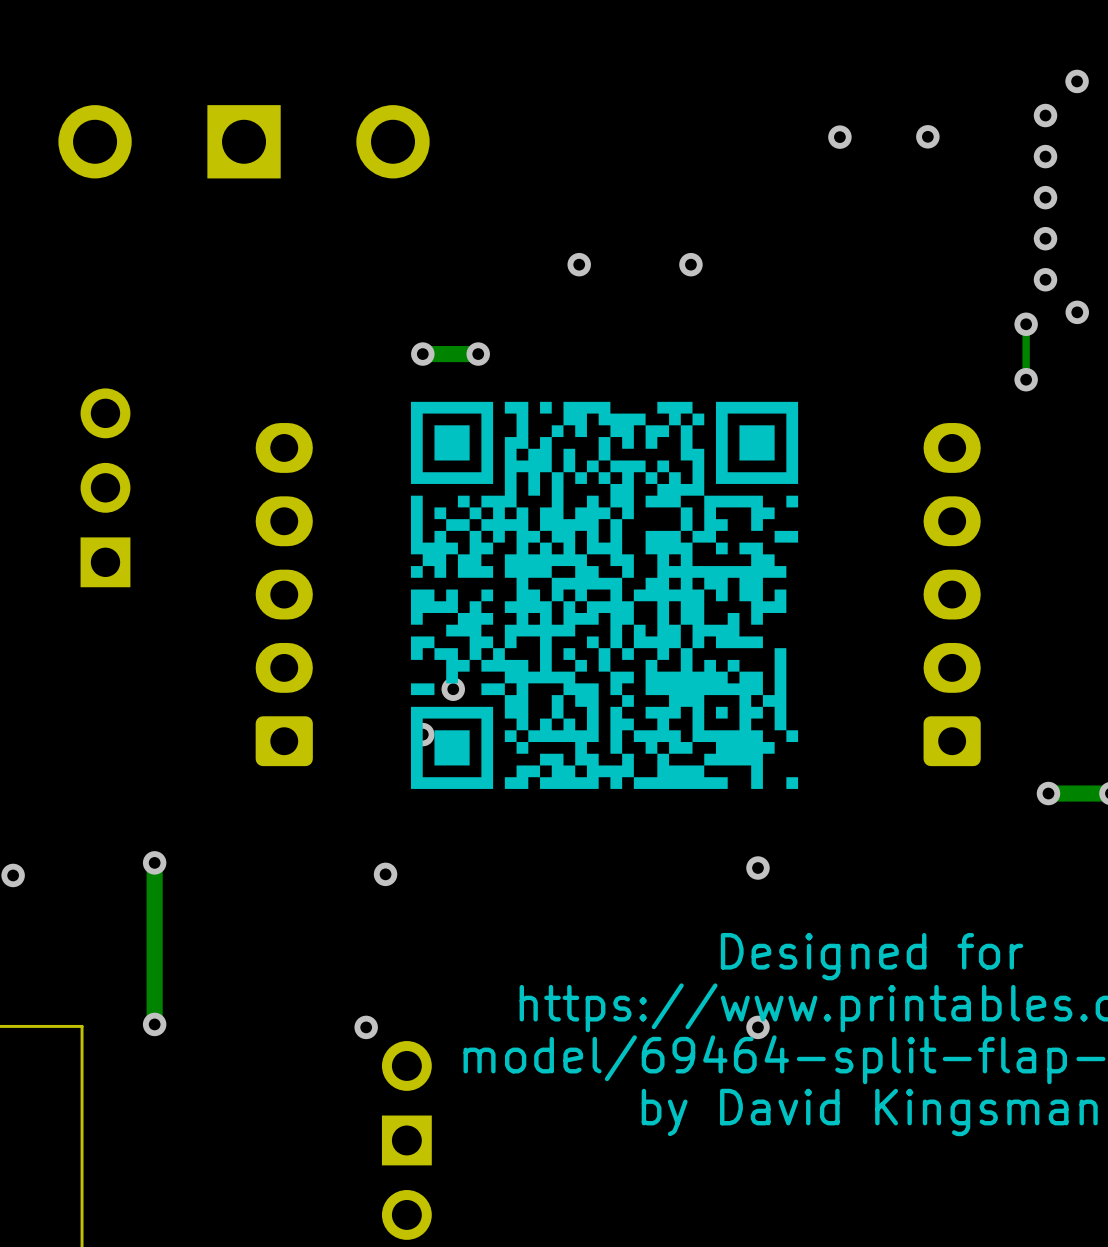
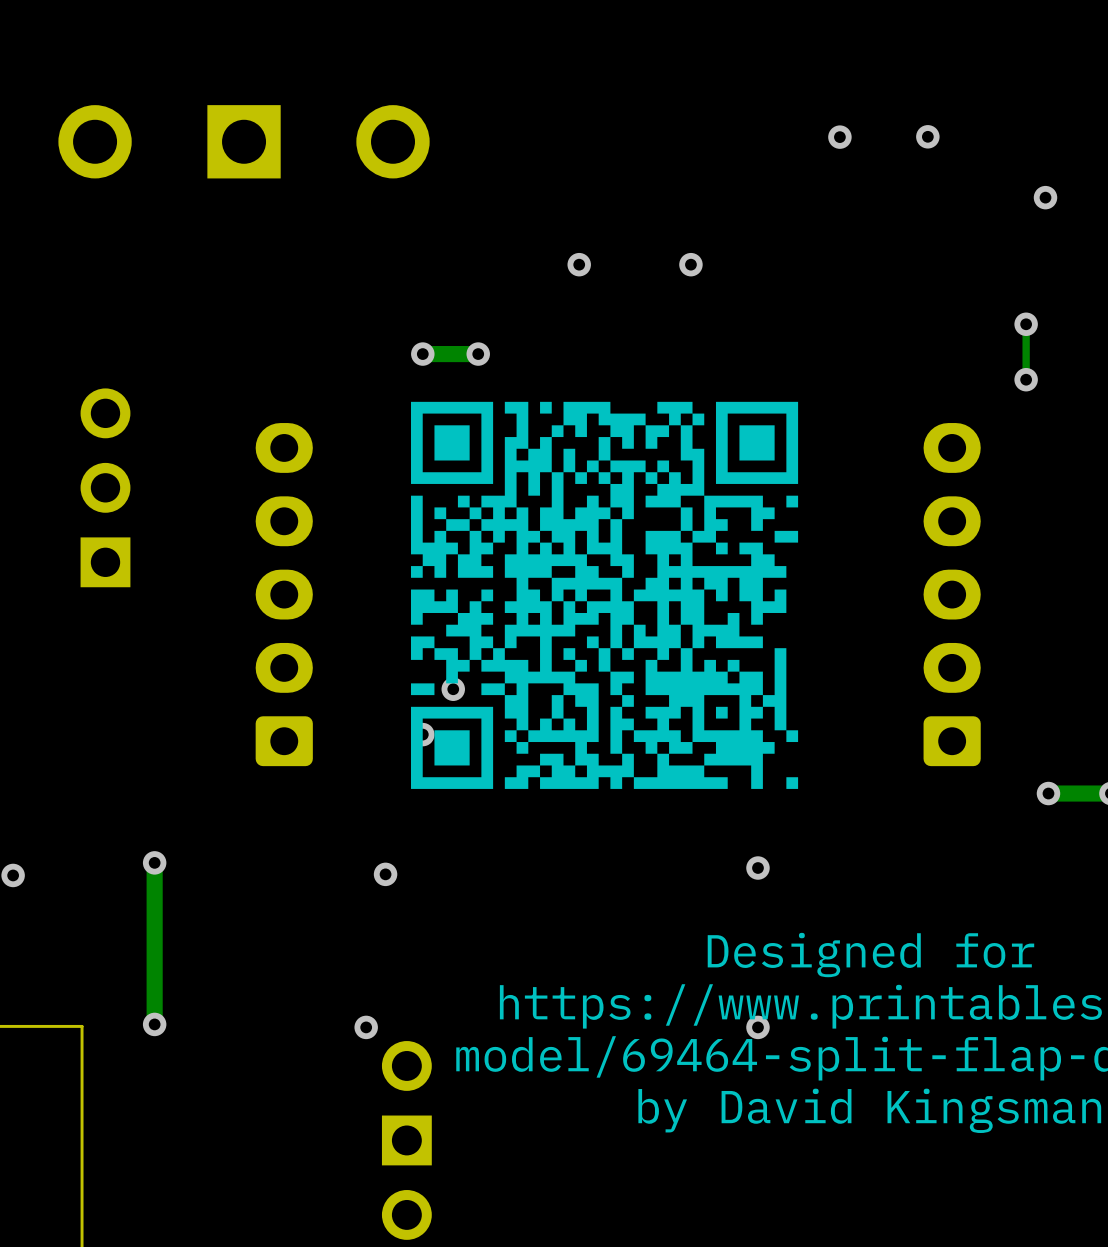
via: (1077, 81) -> none
via: (1045, 115) -> none
via: (1045, 156) -> none
via: (1045, 238) -> none
via: (1045, 279) -> none
via: (1077, 312) -> none

